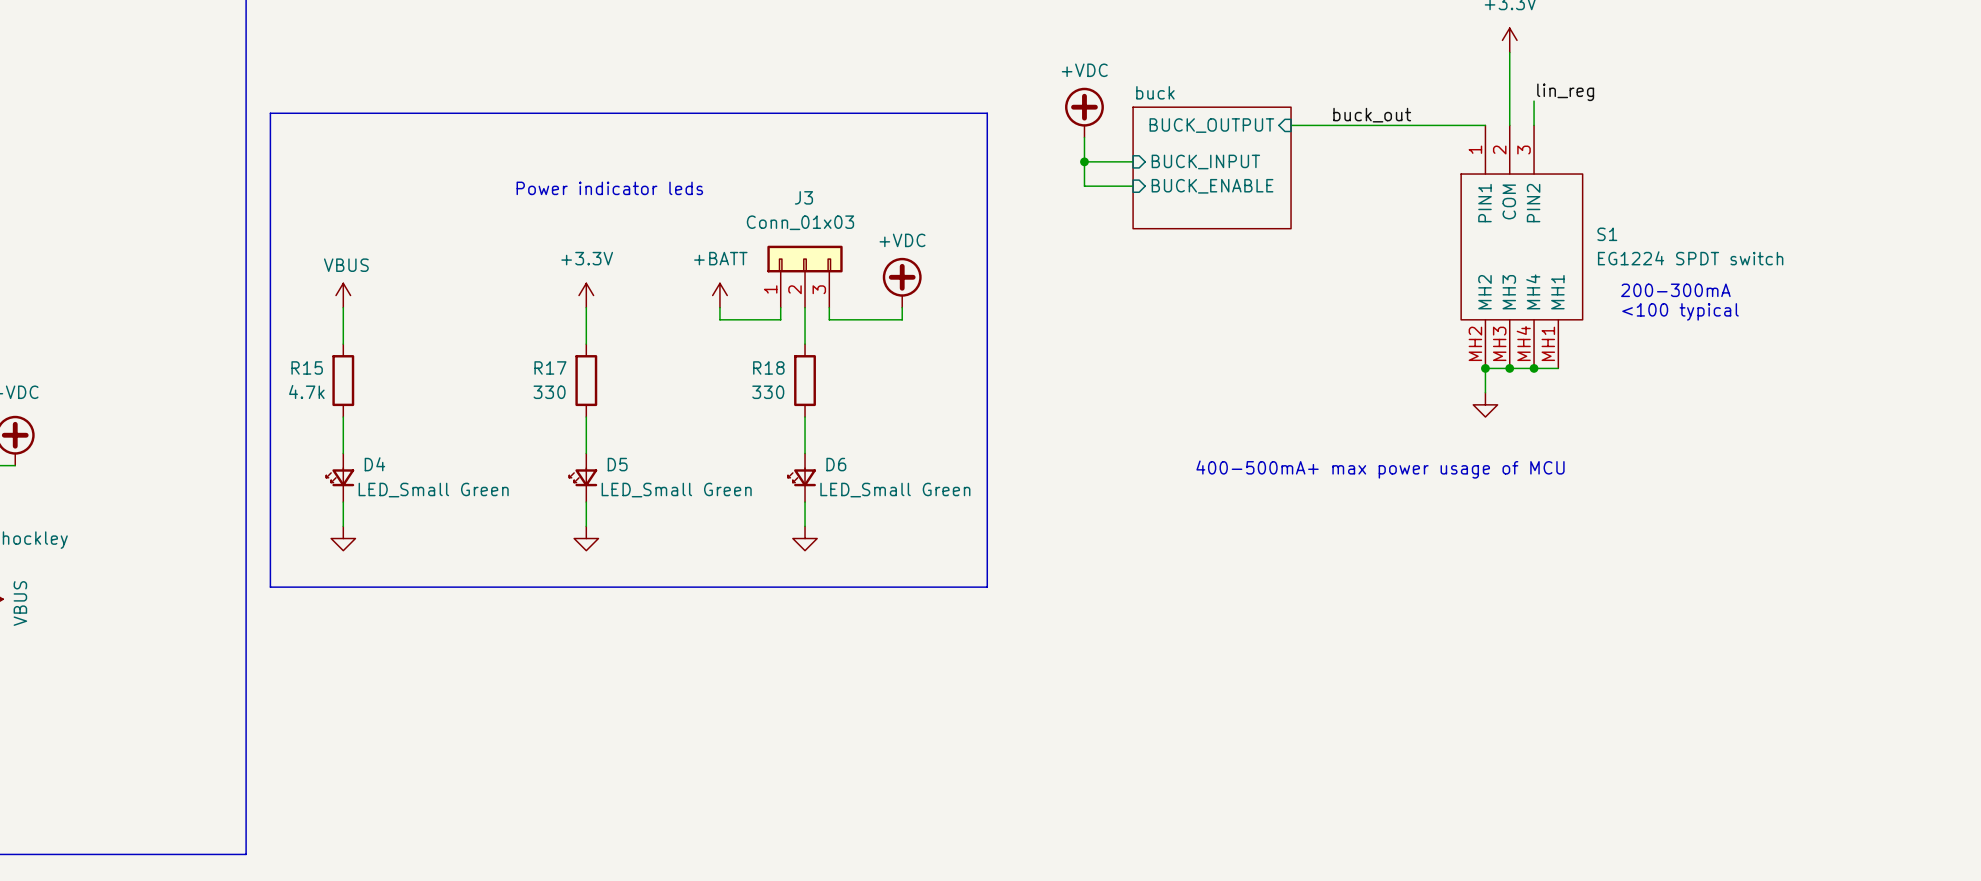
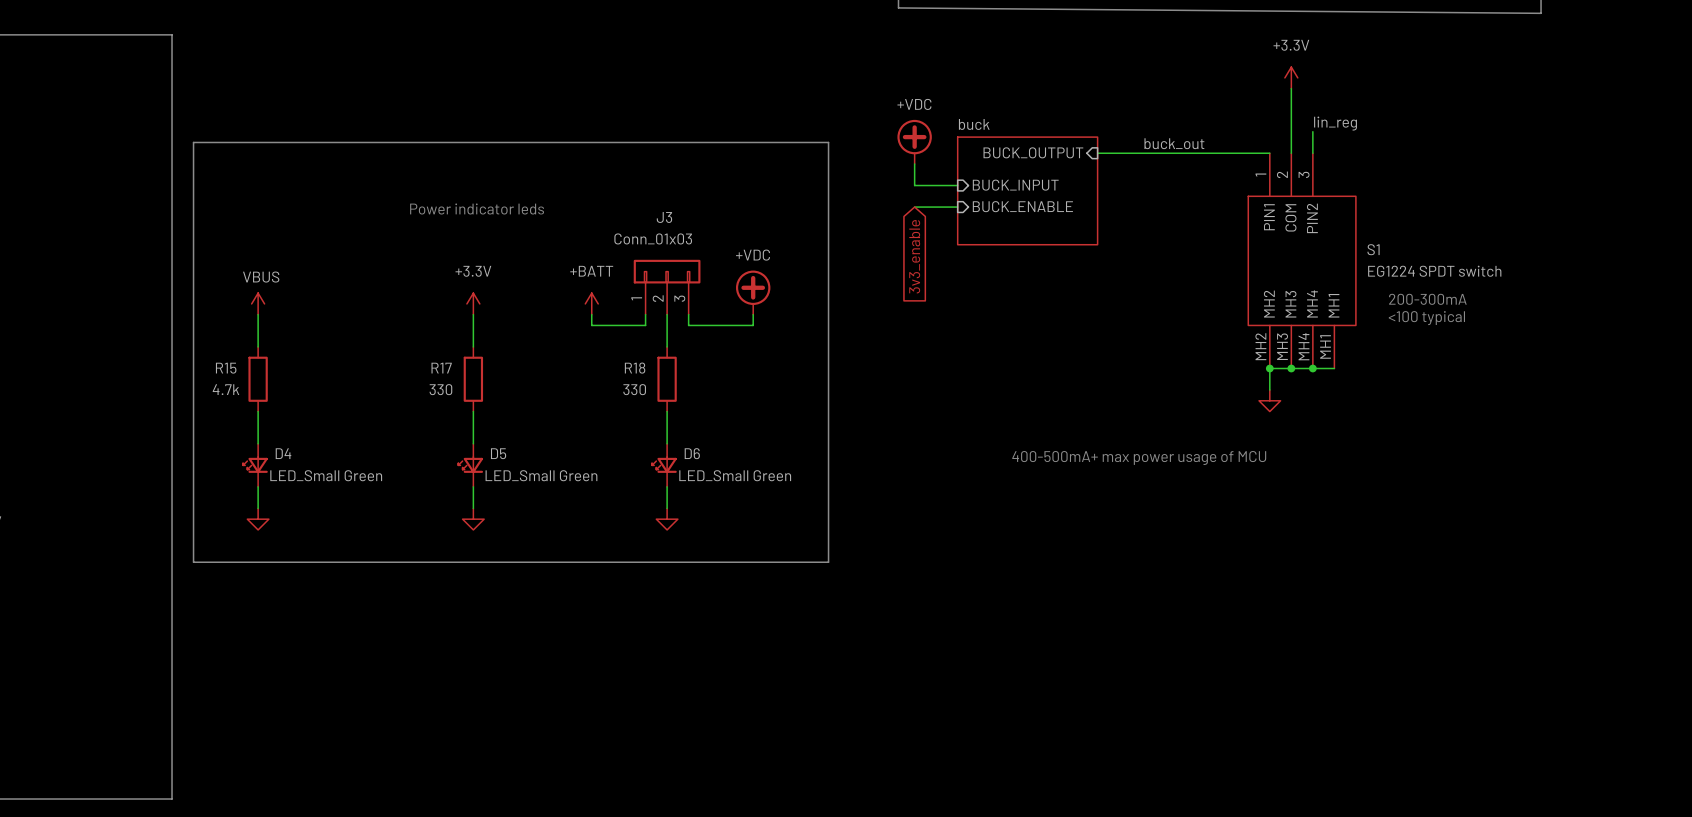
wire: (1084, 161) (1084, 186) -> none
junction: (1084, 161) -> none
global label: none -> 3v3_enable (914, 256)

